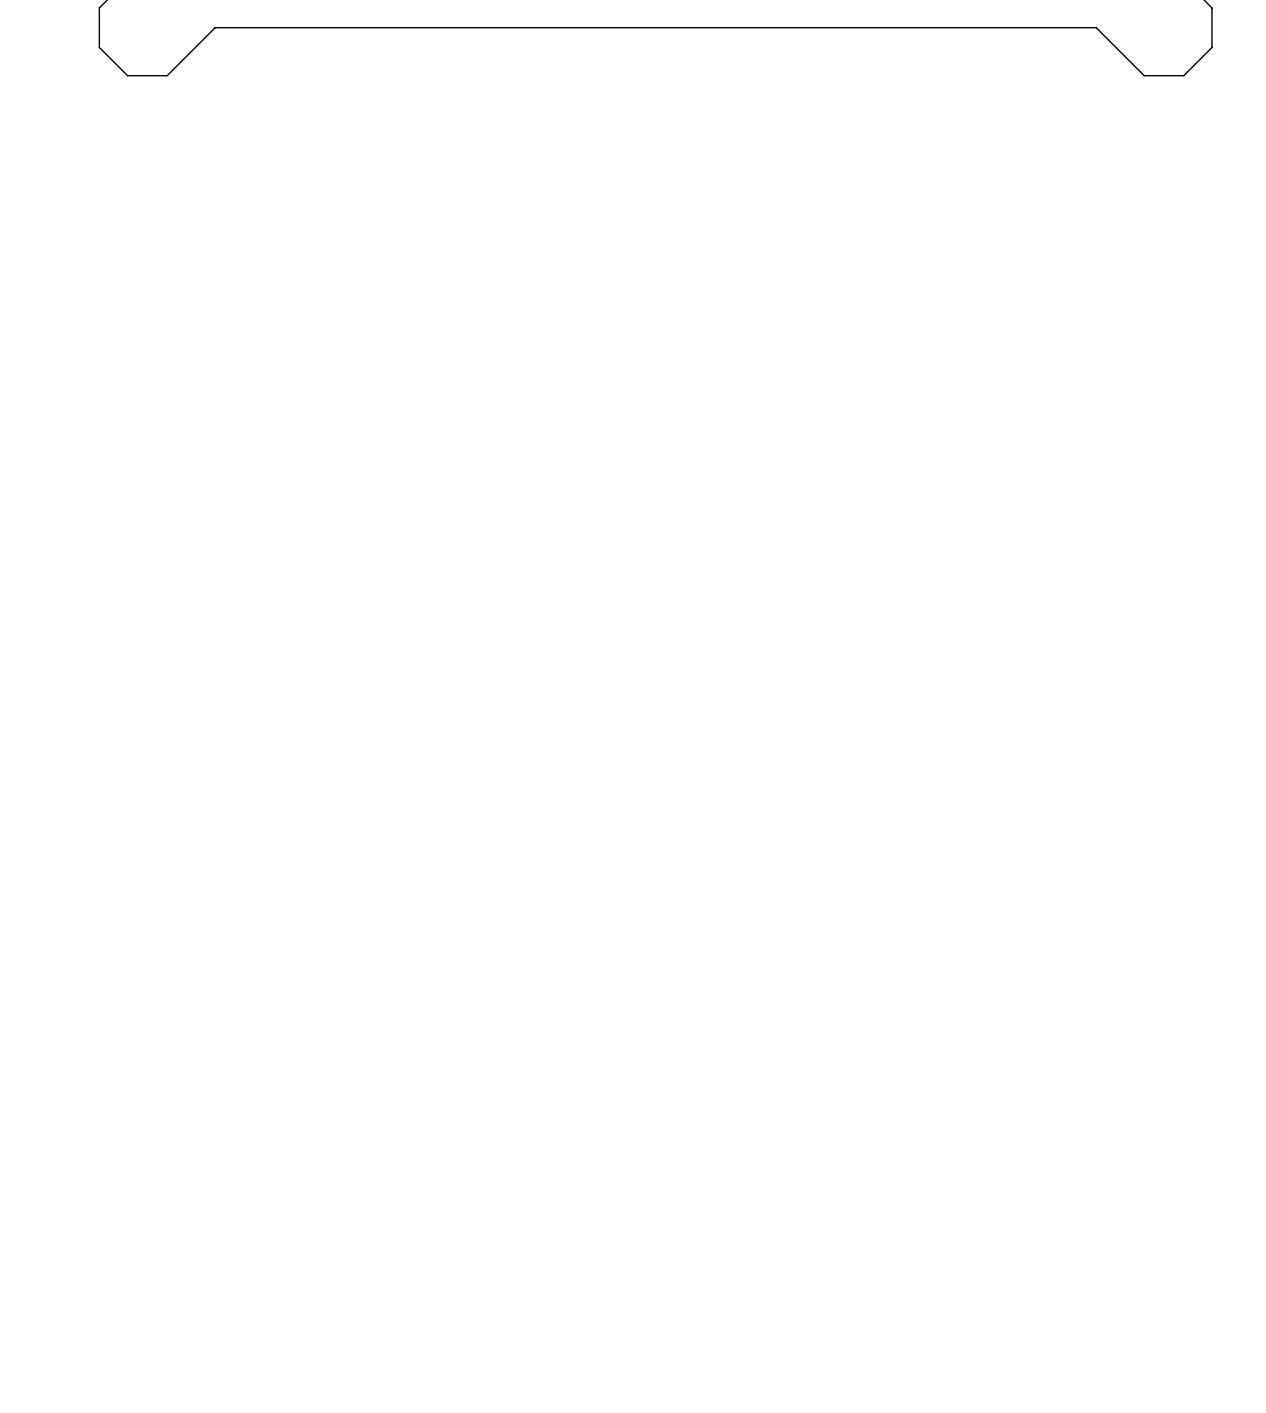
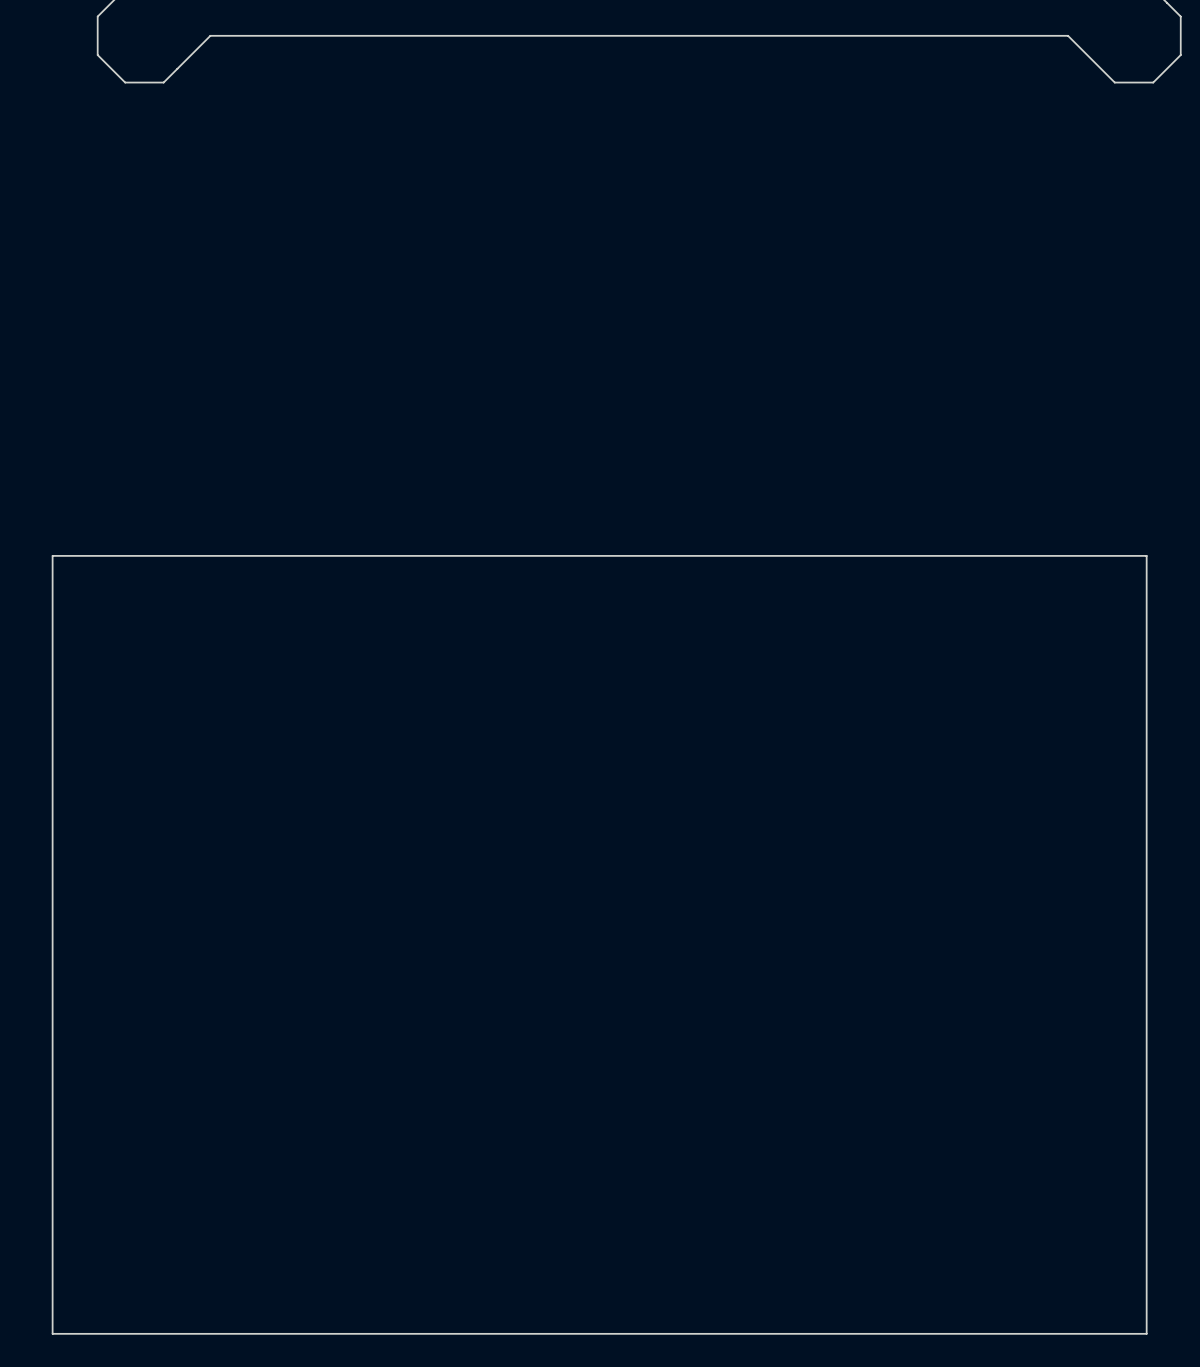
board edge: none -> (52, 555) (1146, 555) (1146, 1333) (52, 1333) (52, 555)

